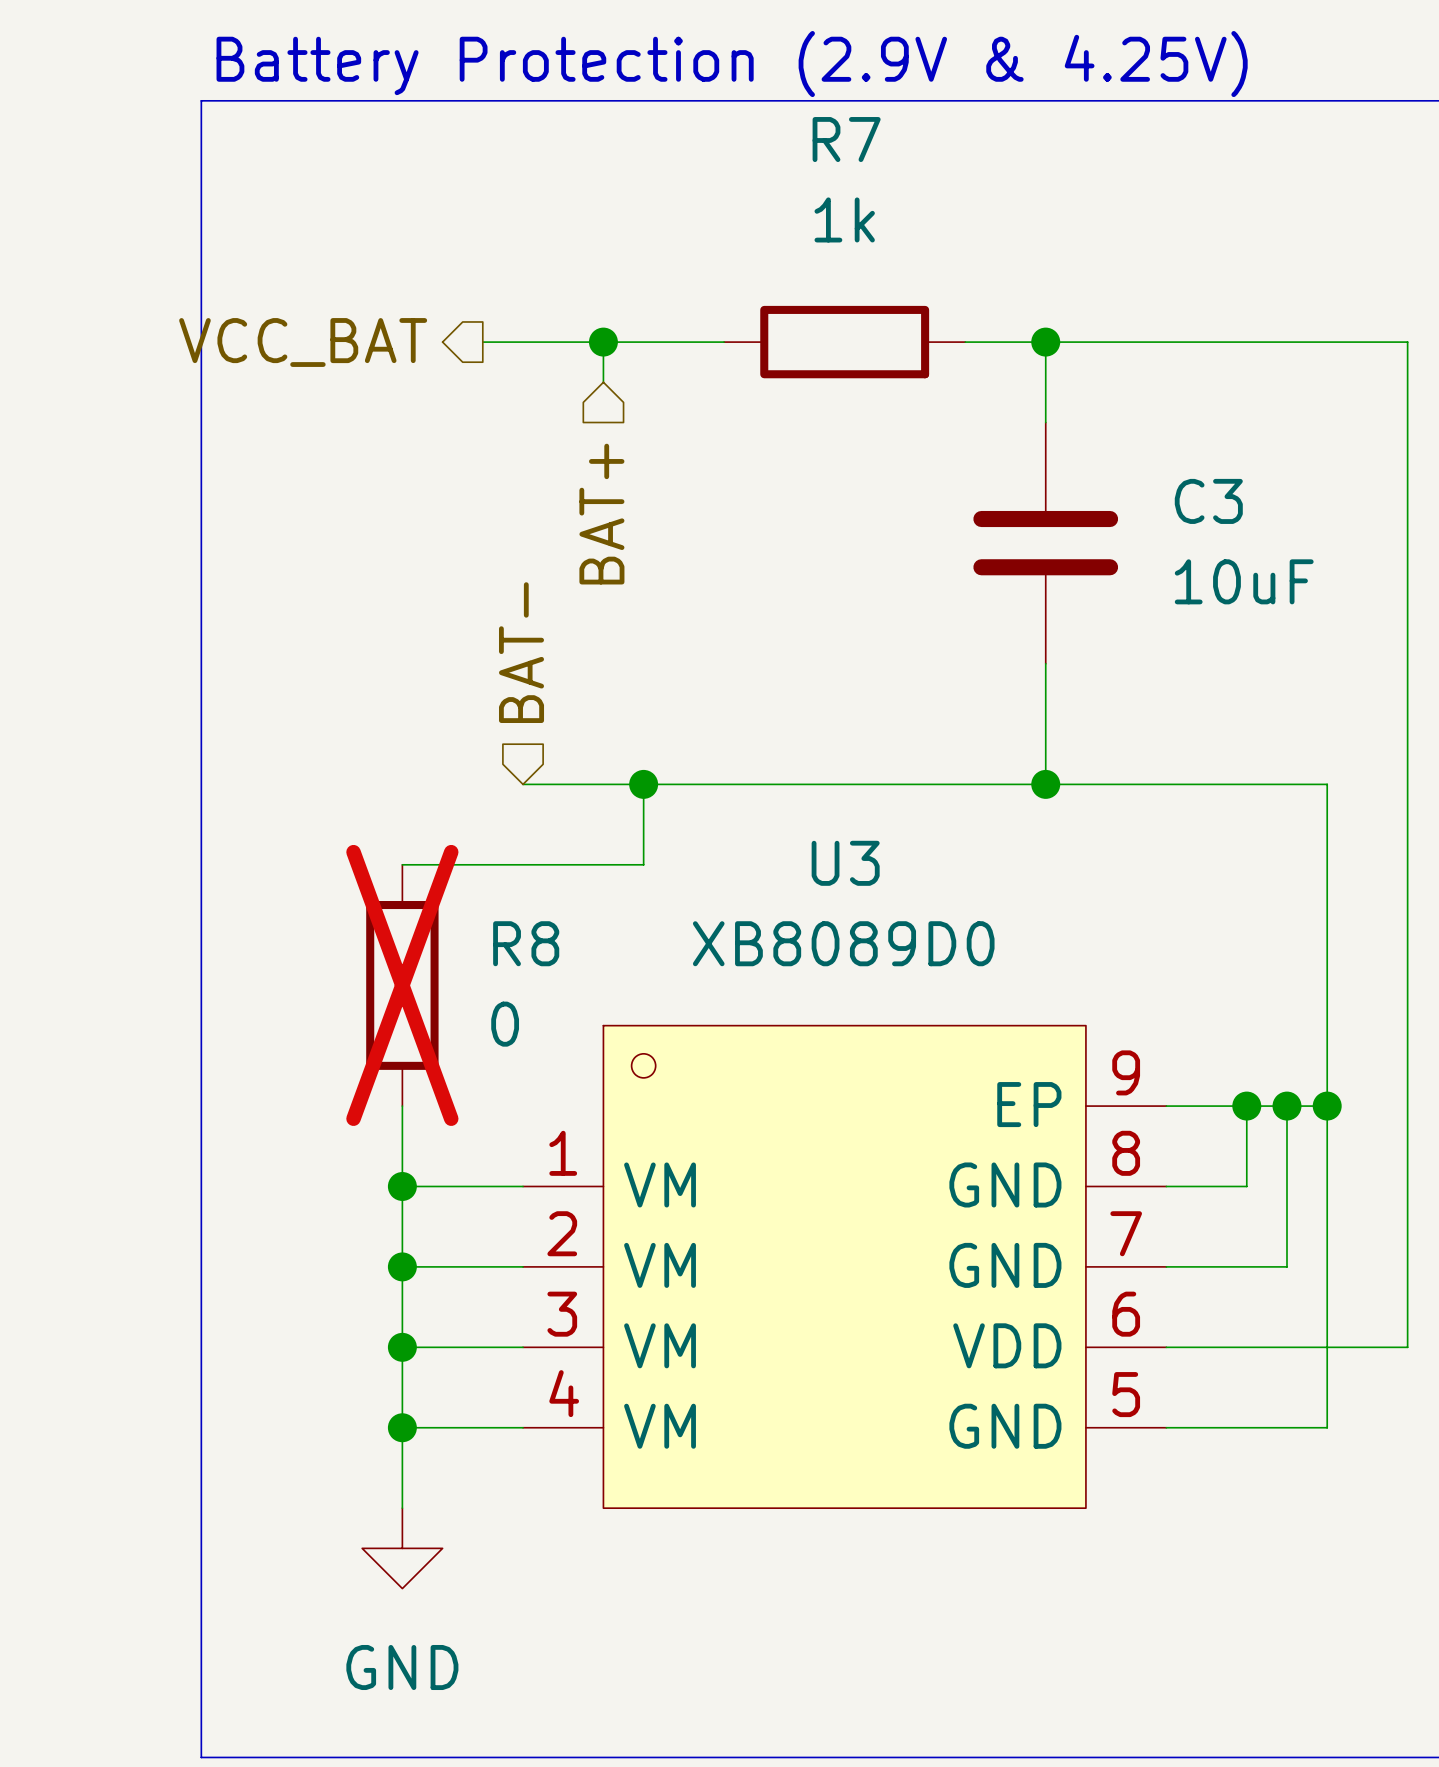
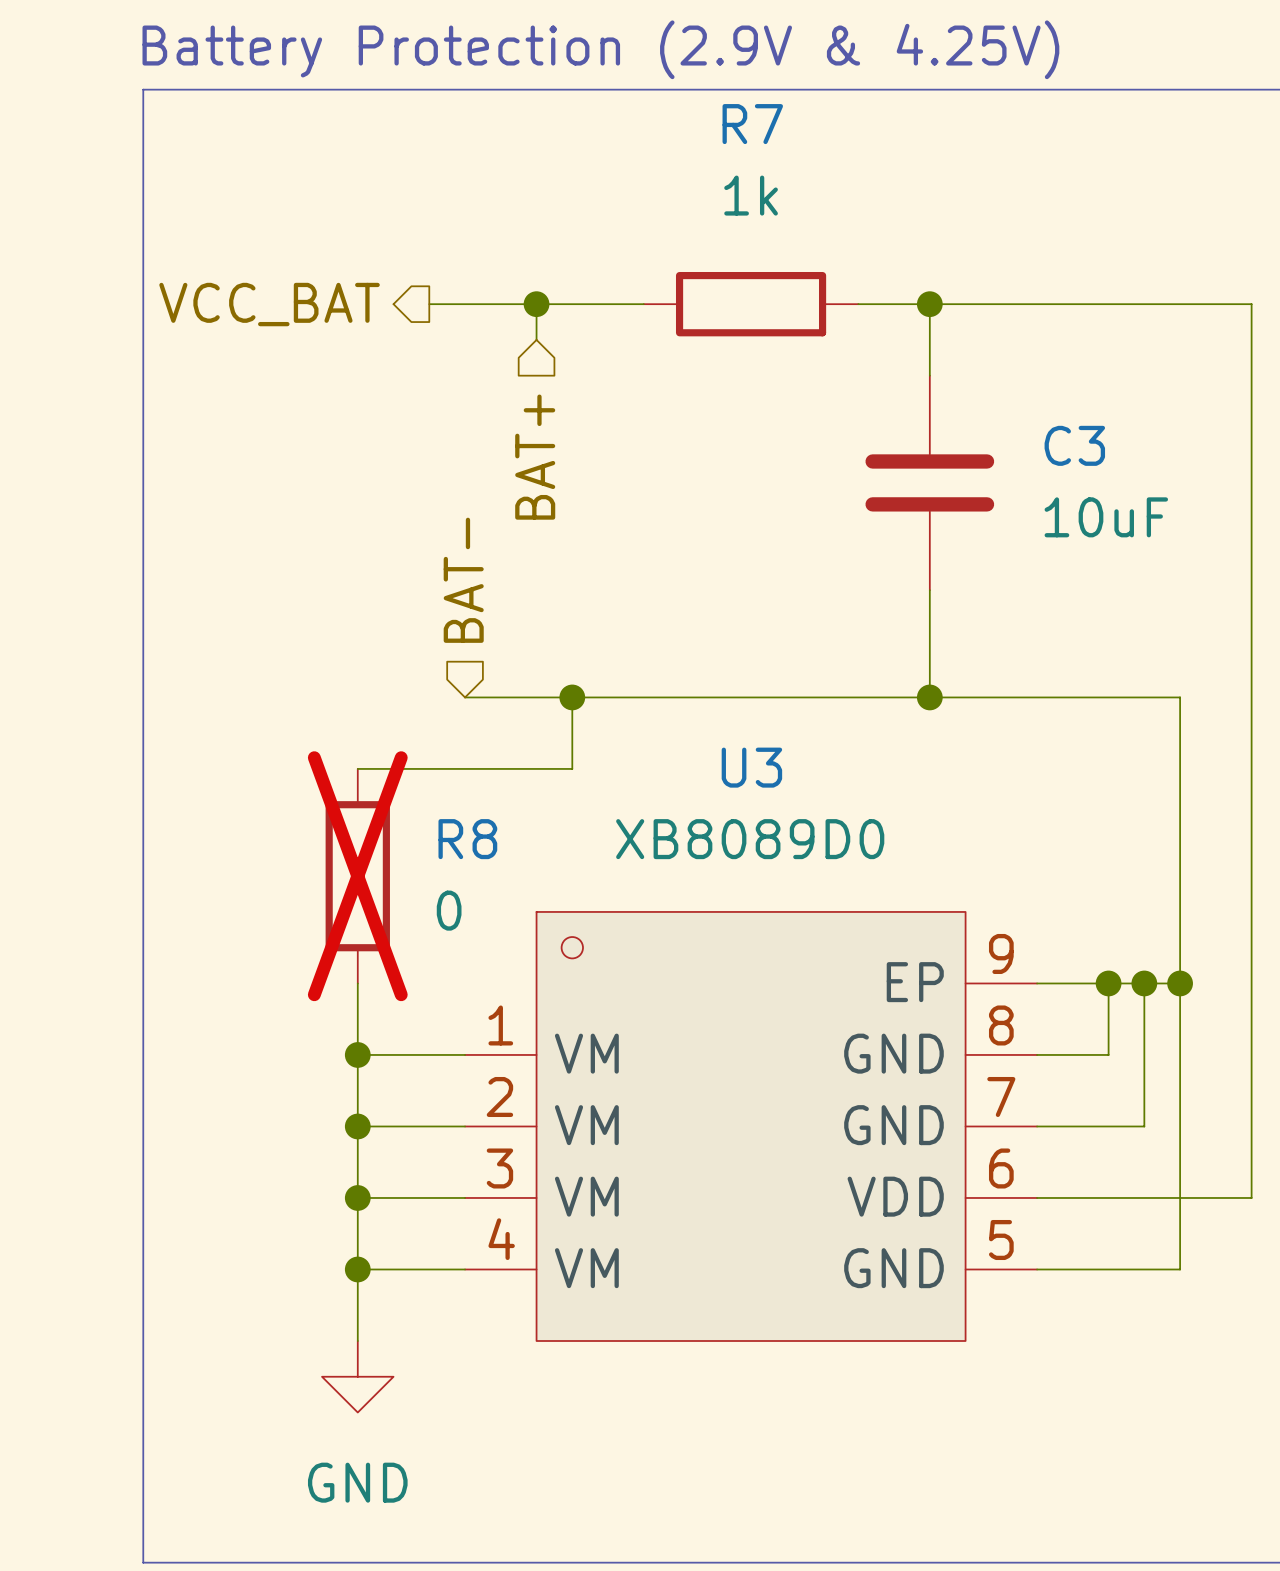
text position: Battery Protection (2.9V & 4.25V) (732, 64) -> Battery Protection (2.9V & 4.25V) (600, 49)
line: (201, 100) (201, 1757) -> (179, 89) (143, 89) (143, 1562) (179, 1562)

